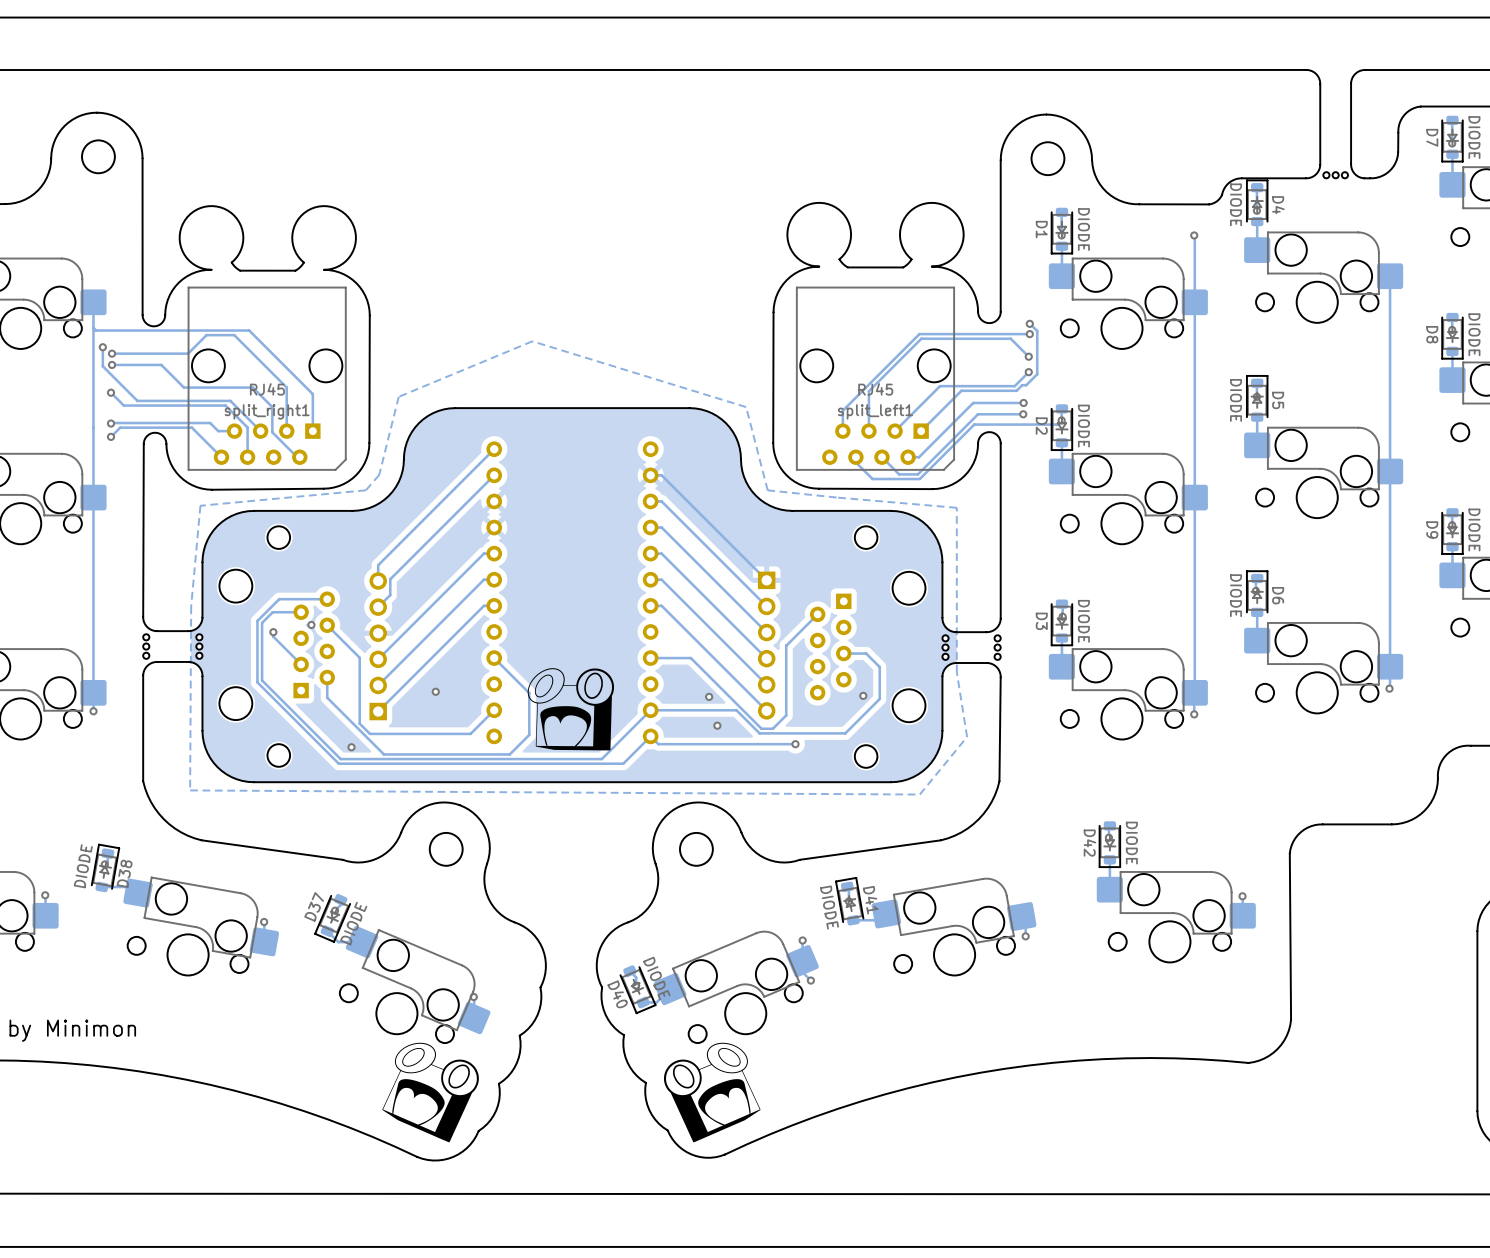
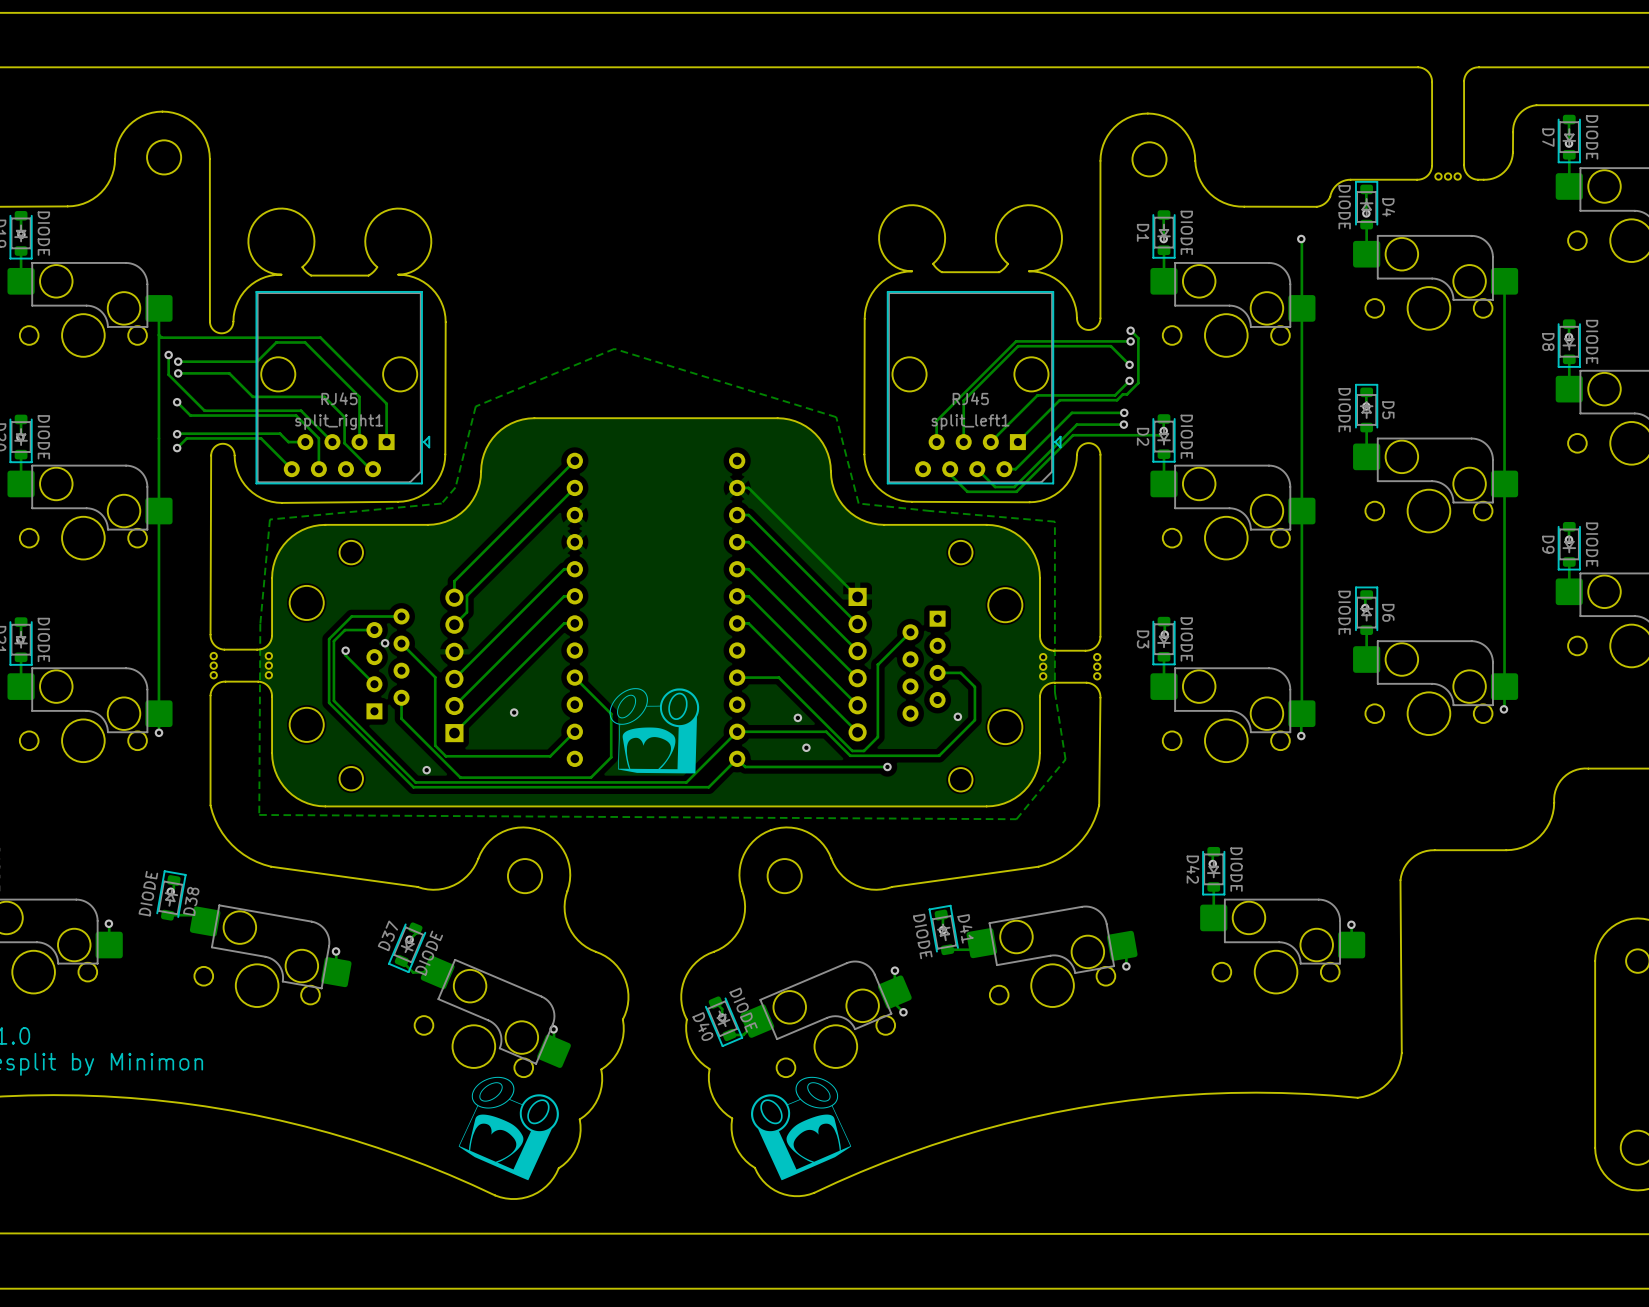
split_right1 footprint: [187, 286, 347, 471] -> [255, 291, 430, 485]
split_left1 footprint: [796, 286, 955, 471] -> [887, 291, 1062, 485]

